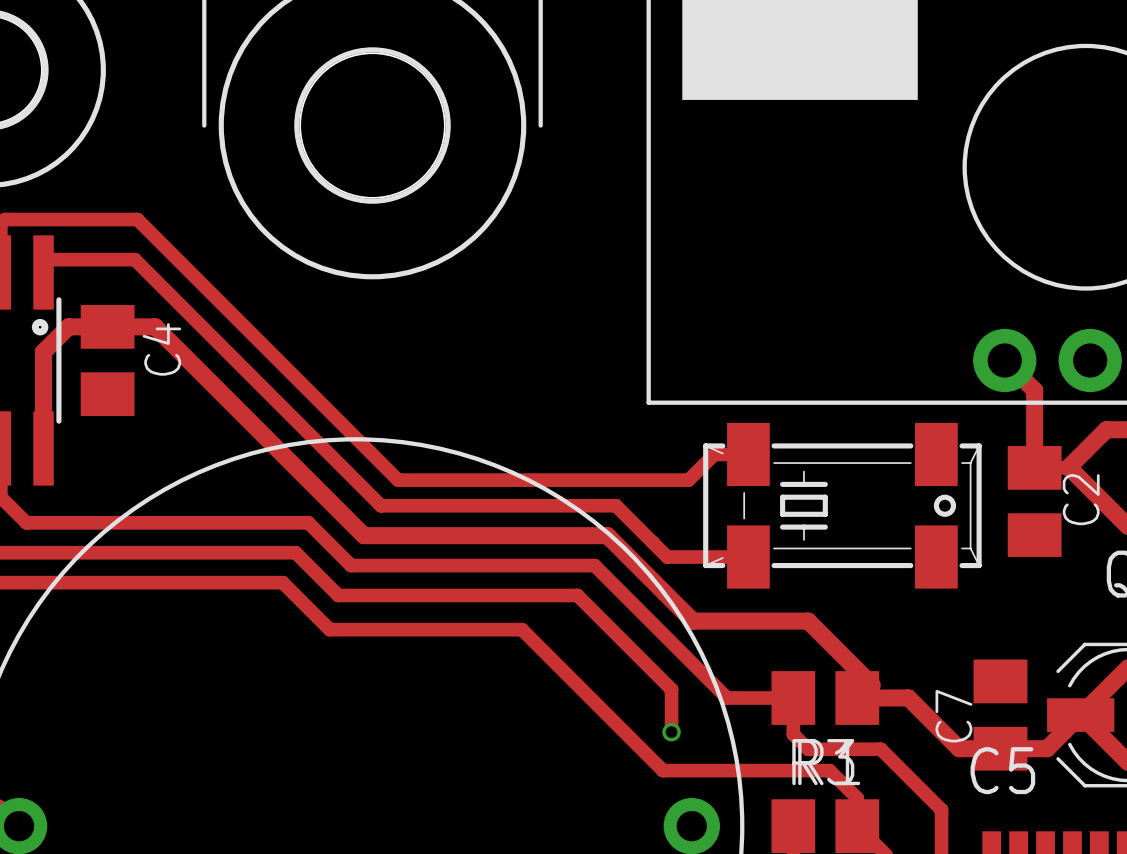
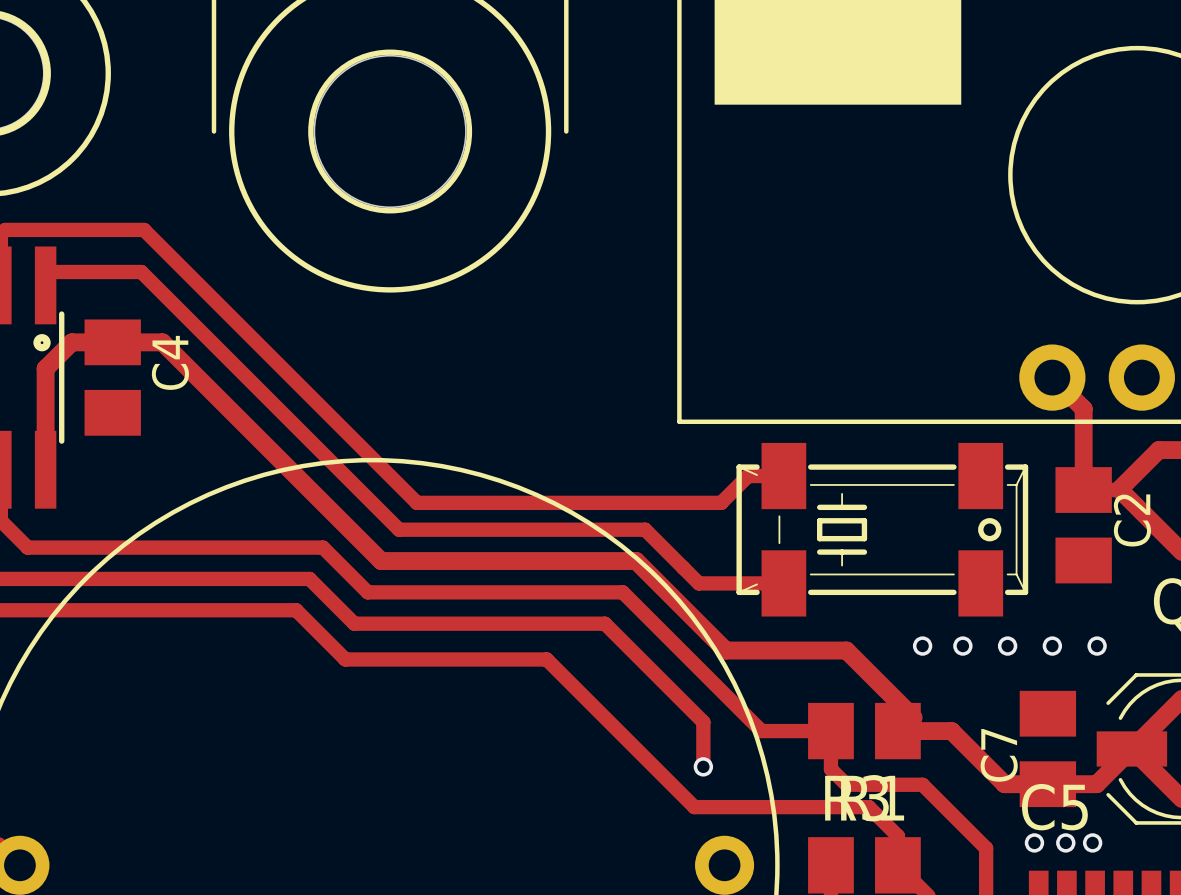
via: none -> (922, 646)
via: none -> (962, 646)
via: none -> (1007, 646)
via: none -> (1052, 646)
via: none -> (1097, 646)
via: none -> (1034, 842)
via: none -> (1065, 842)
via: none -> (1092, 842)

